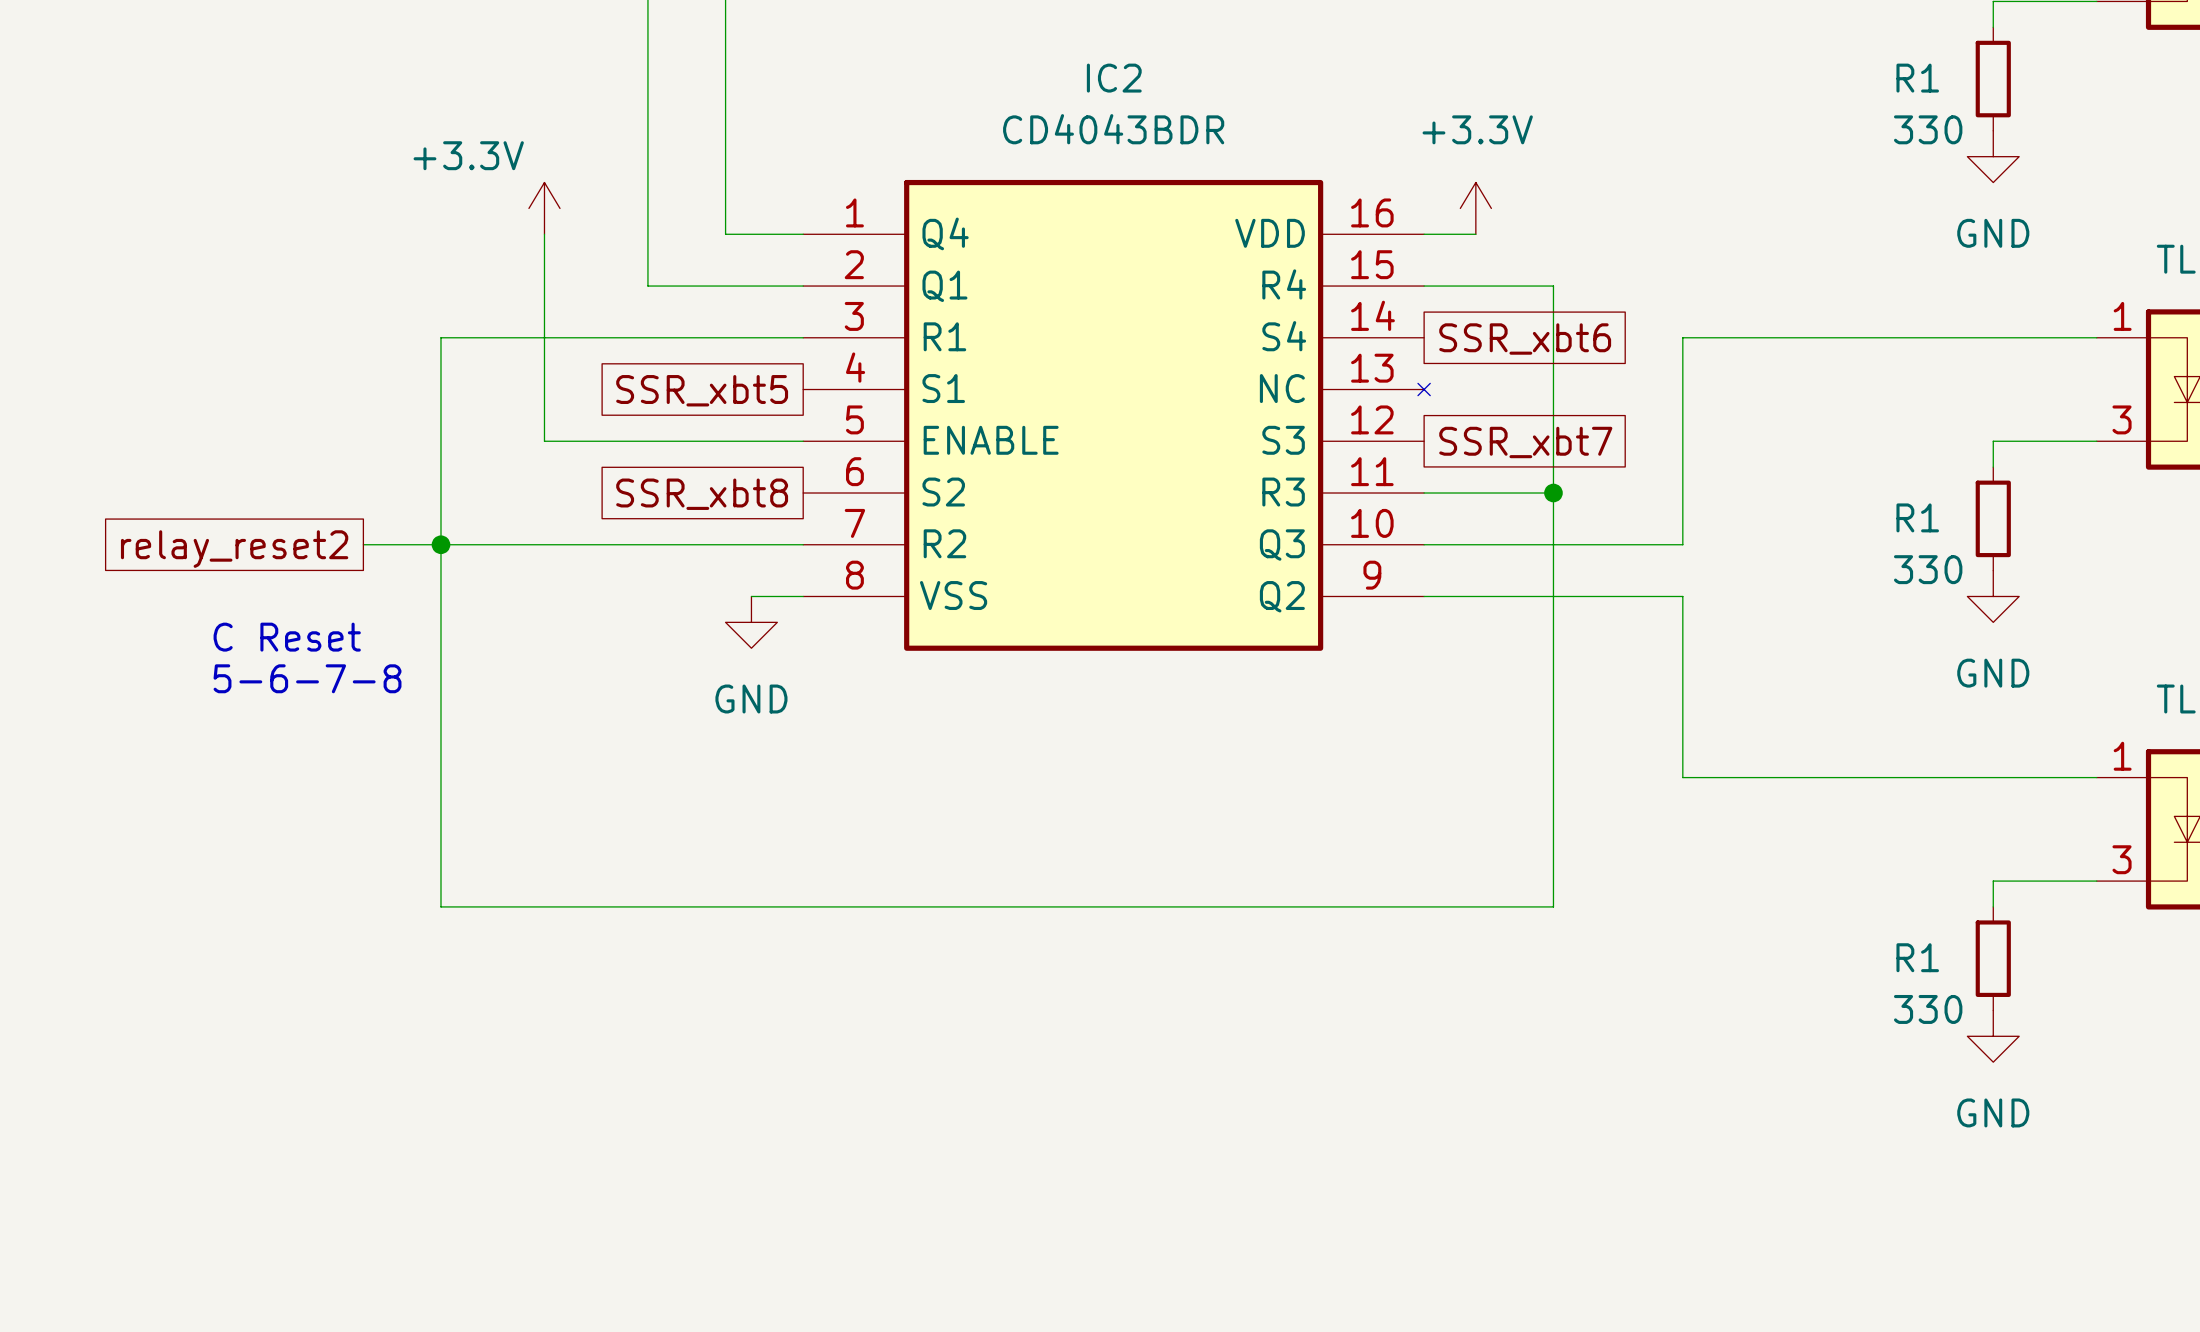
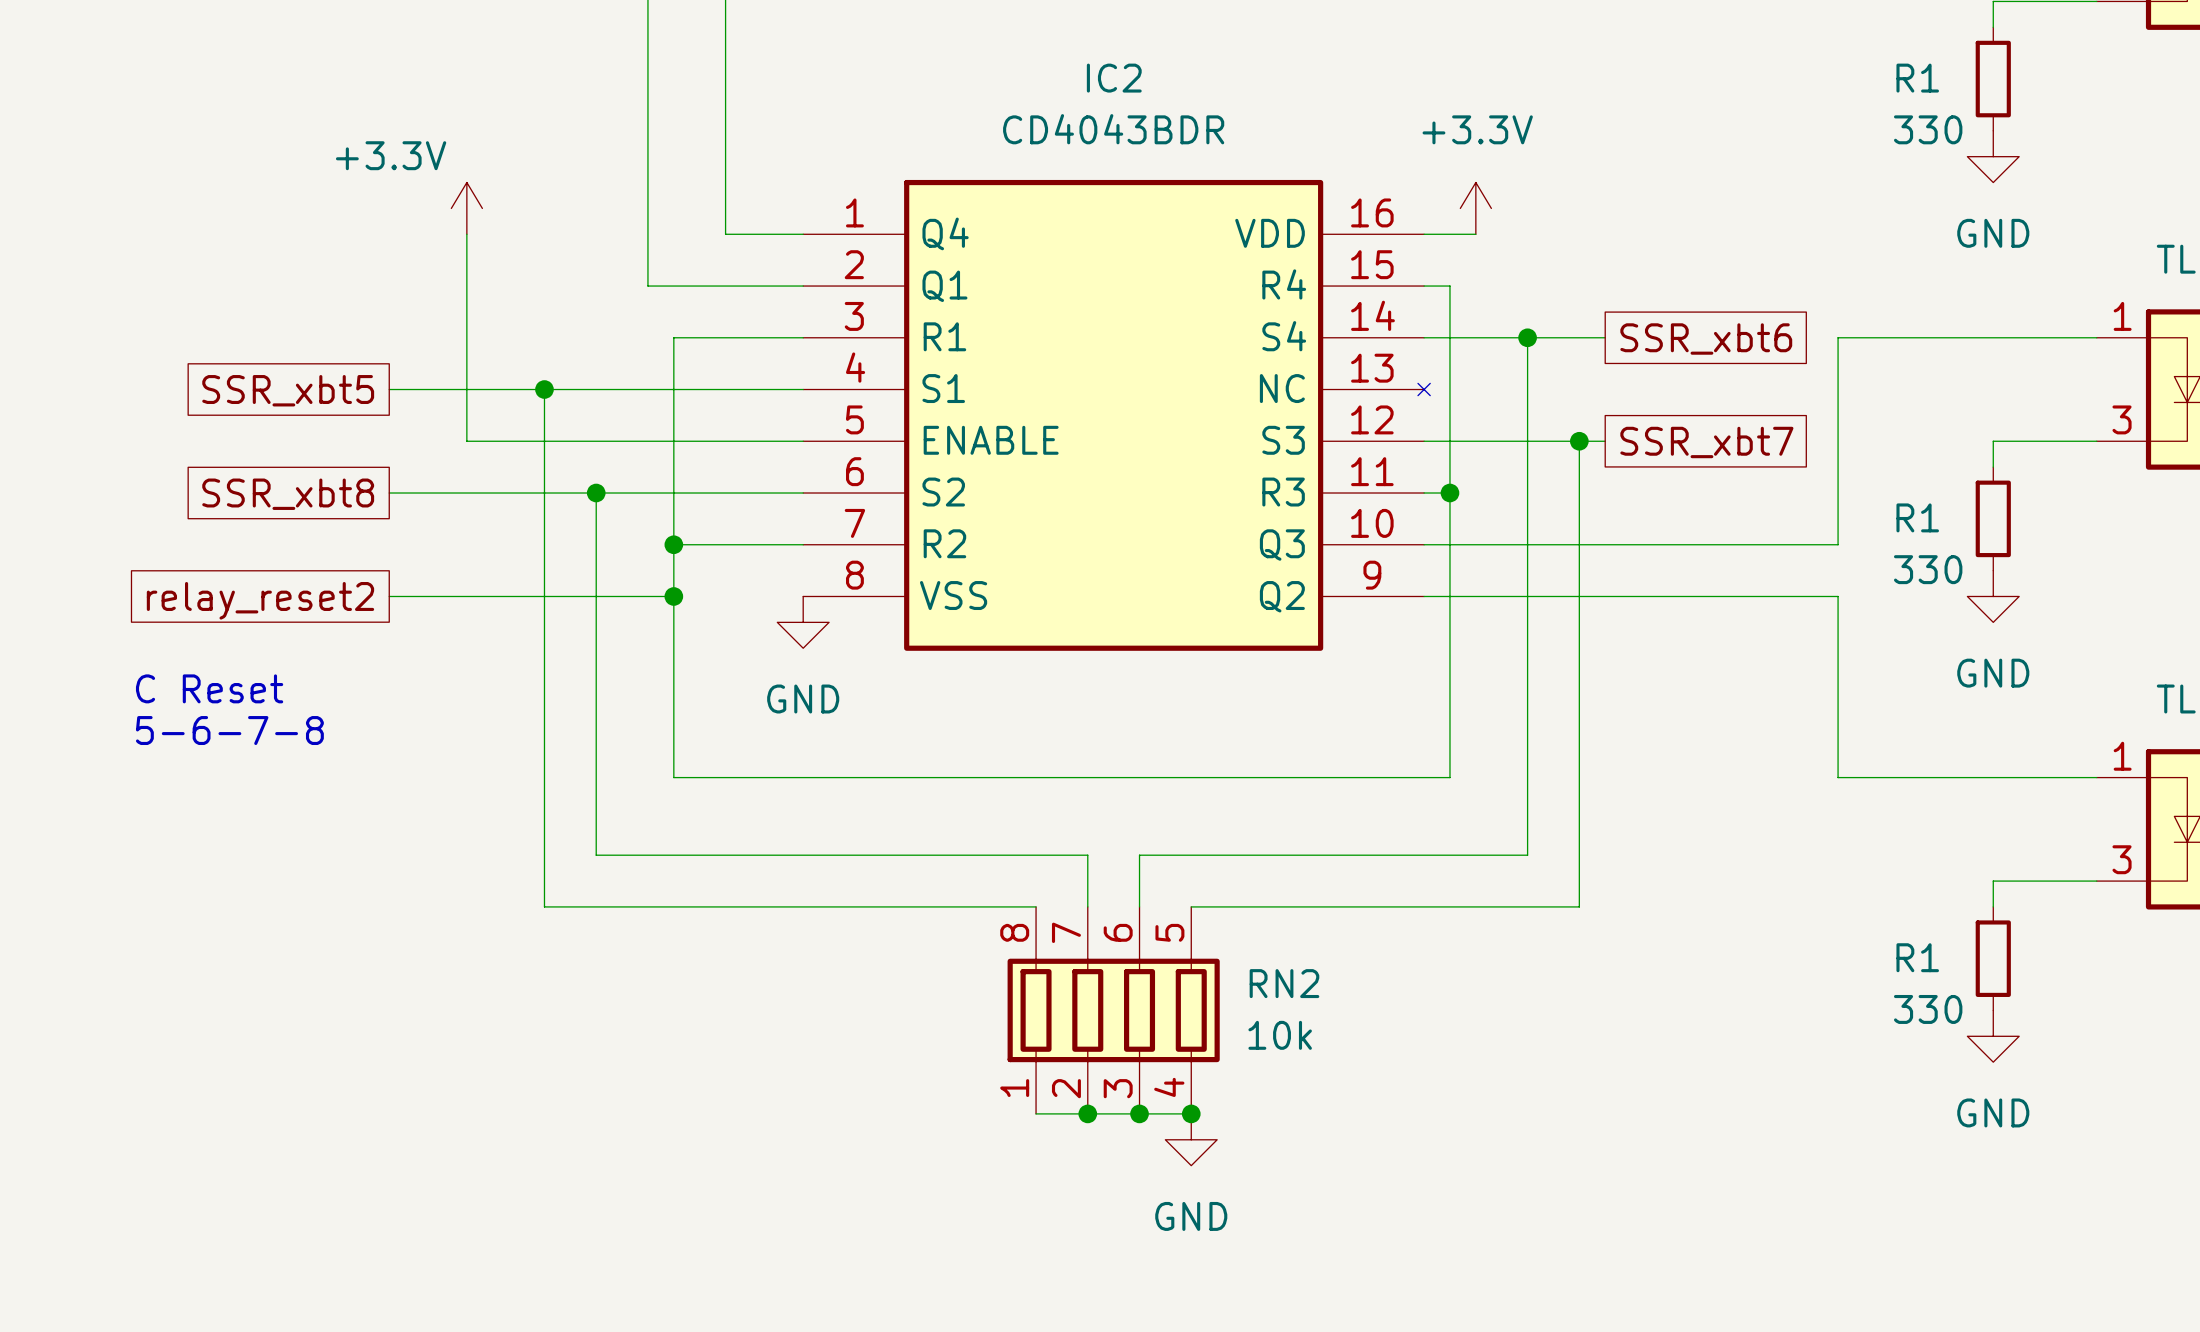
power symbol position: +3.3V (544, 208) -> +3.3V (466, 208)
wire: (544, 234) (544, 389) -> none
wire: (1449, 286) (1553, 286) (1553, 906) -> (1579, 441) (1579, 906) (1553, 906)
wire: none -> (1449, 286) (1449, 777) (673, 777) (673, 337)
wire: (673, 337) (440, 337) (440, 906) (544, 906) -> (466, 234) (466, 441) (544, 441) (544, 906)
wire: none -> (1424, 337) (1605, 337)
wire: none -> (1527, 337) (1527, 855) (1139, 855) (1139, 906)
junction: none -> (1527, 337)
wire: (1838, 337) (1682, 337) (1682, 544) -> (1838, 337) (1838, 544) (1682, 544)
global label position: SSR_xbt6 (1525, 339) -> SSR_xbt6 (1706, 339)
wire: none -> (389, 389) (803, 389)
junction: none -> (544, 389)
global label position: SSR_xbt5 (702, 390) -> SSR_xbt5 (288, 390)
wire: none -> (1424, 441) (1605, 441)
junction: none -> (1579, 441)
global label position: SSR_xbt7 (1525, 442) -> SSR_xbt7 (1706, 442)
wire: none -> (389, 493) (803, 493)
wire: none -> (596, 493) (596, 855) (1087, 855) (1087, 906)
junction: none -> (596, 493)
wire: (1449, 493) (1553, 493) -> none
junction: none -> (1449, 493)
junction: (1553, 493) -> none
global label position: SSR_xbt8 (702, 494) -> SSR_xbt8 (288, 494)
wire: (363, 544) (673, 544) -> none
junction: (440, 544) -> none
junction: none -> (673, 544)
global label position: relay_reset2 (234, 549) -> relay_reset2 (260, 600)
wire: none -> (389, 596) (673, 596)
junction: none -> (673, 596)
wire: (751, 596) (803, 596) -> none
wire: (1682, 596) (1682, 777) (1838, 777) -> (1682, 596) (1838, 596) (1838, 777)
power symbol position: GND (751, 622) -> GND (803, 622)
text position: C Reset (287, 637) -> C Reset (209, 688)
text position: 5-6-7-8 (307, 678) -> 5-6-7-8 (229, 730)
wire: (1036, 906) (1191, 906) -> (1036, 1113) (1191, 1113)
RN2: none -> 10k (1113, 1010)
junction: none -> (1087, 1113)
junction: none -> (1139, 1113)
junction: none -> (1191, 1113)
power symbol: none -> GND (1191, 1139)

